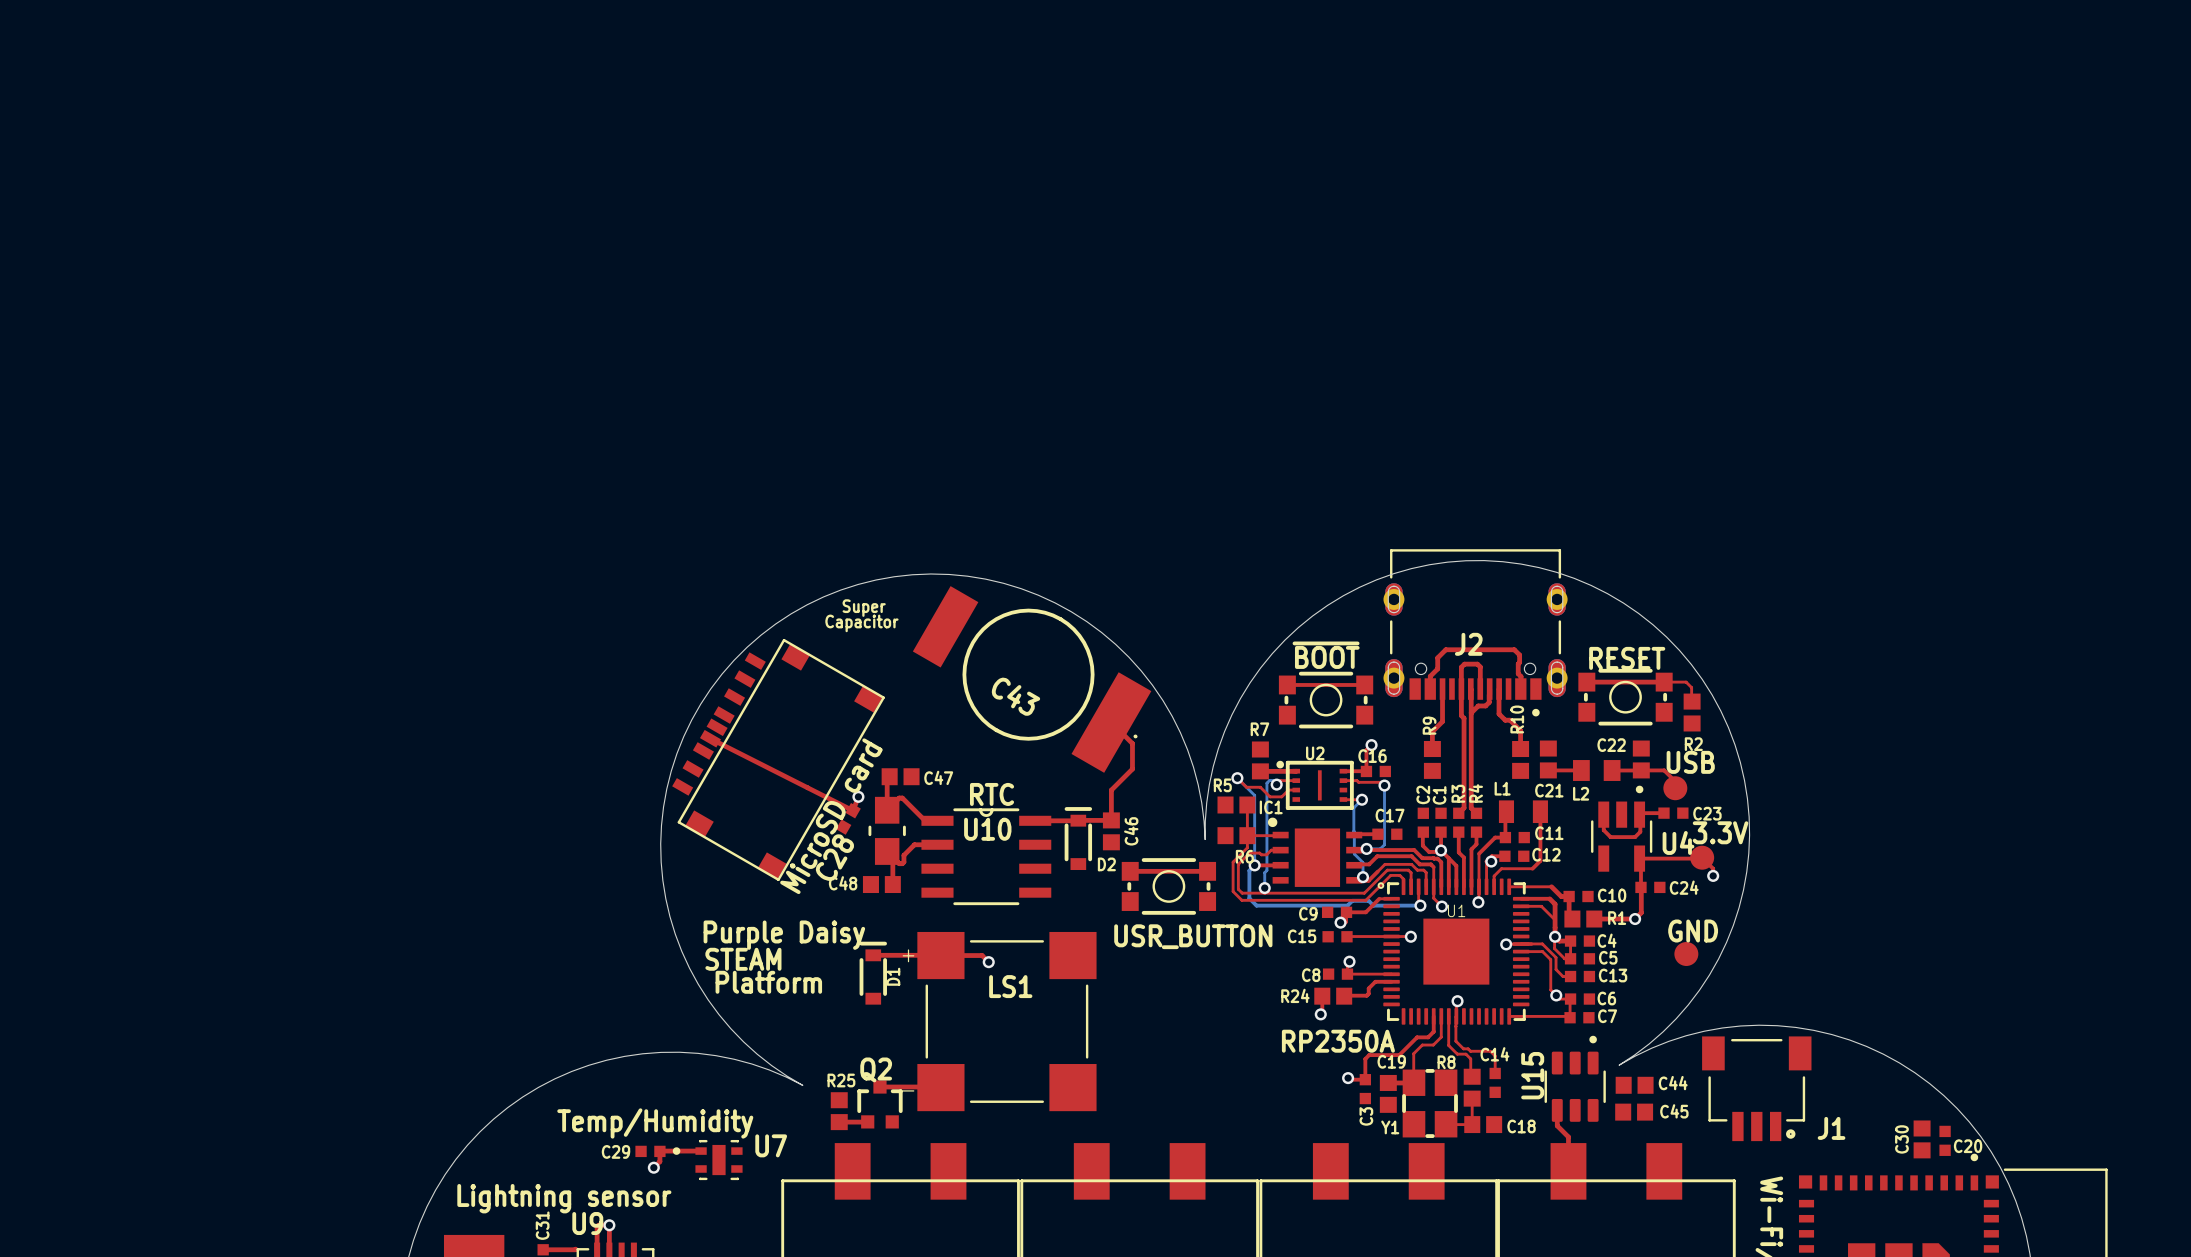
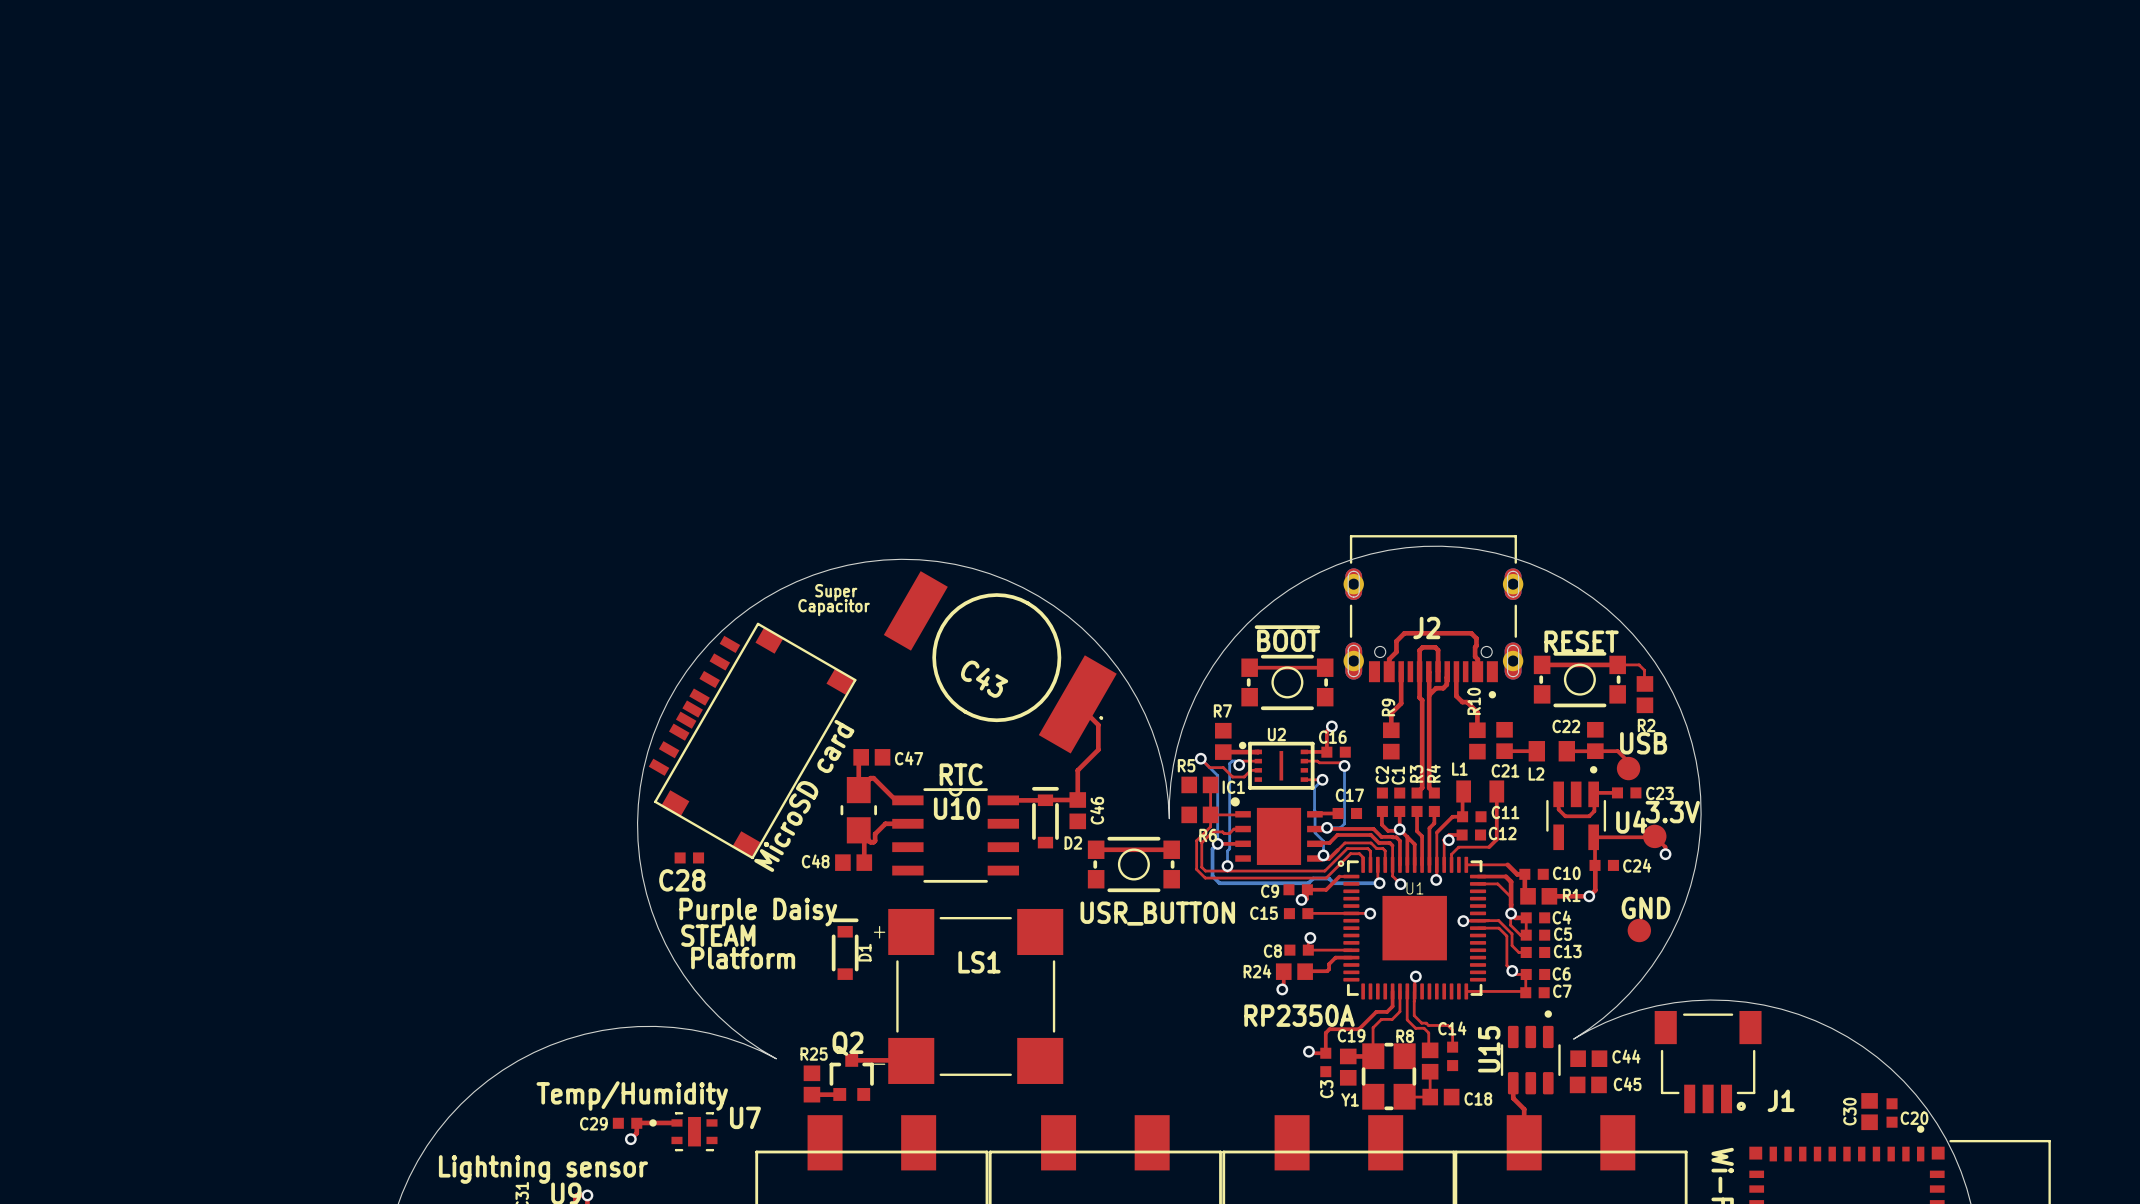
top track: (710, 738) (853, 810) (858, 796) -> none
via: (858, 796) -> none
C28 rotation: 0° (848, 818) -> 60° clockwise (689, 857)
C28 position: (848, 818) -> (689, 857)
top track: (873, 955) (949, 955) (953, 951) (944, 951) (940, 955) (982, 955) (988, 962) -> none
via: (988, 962) -> none

